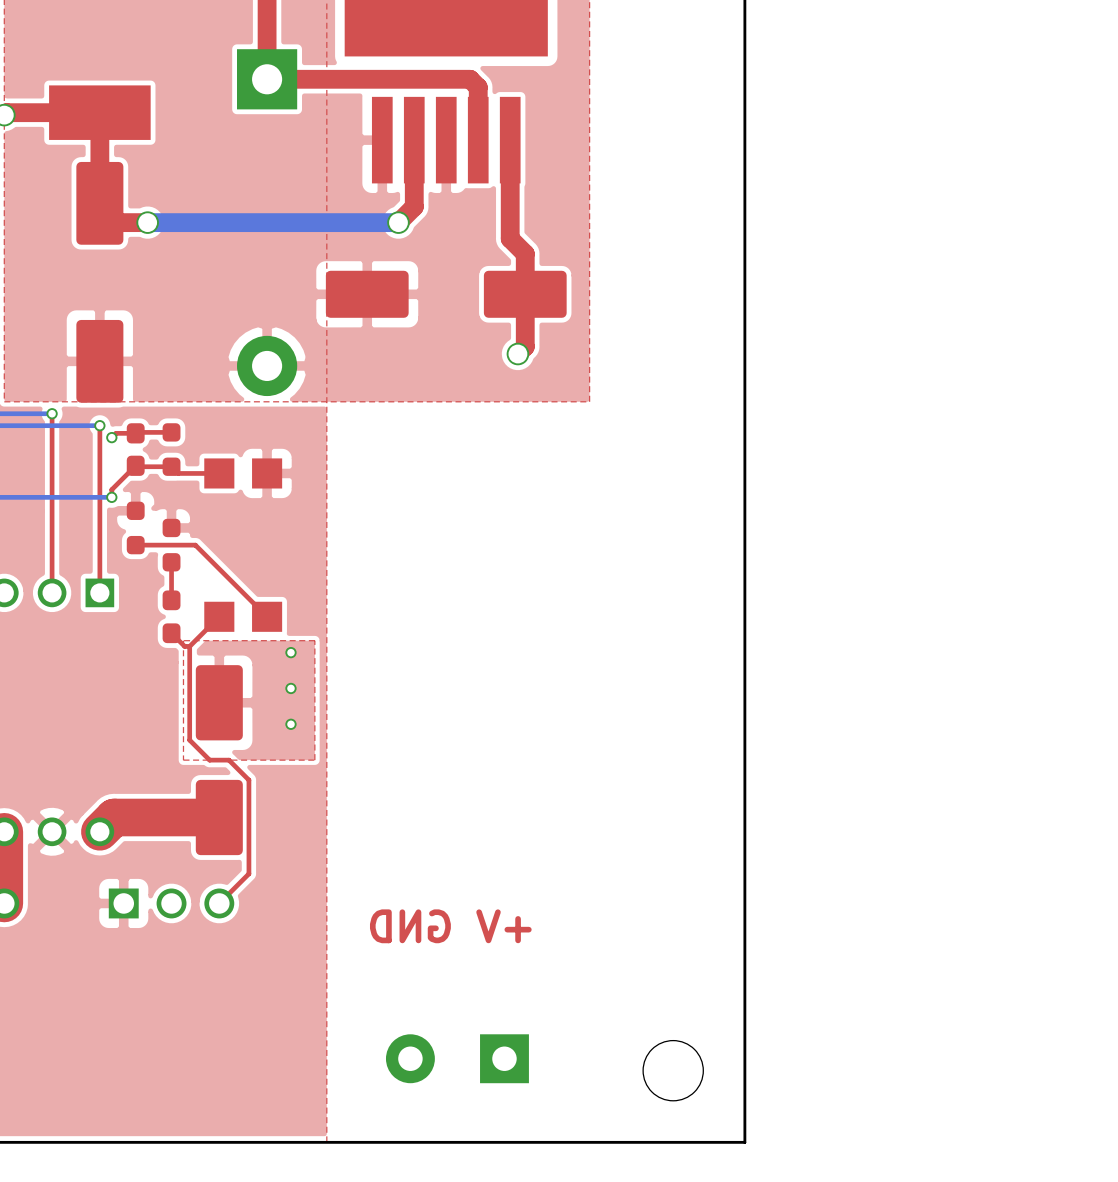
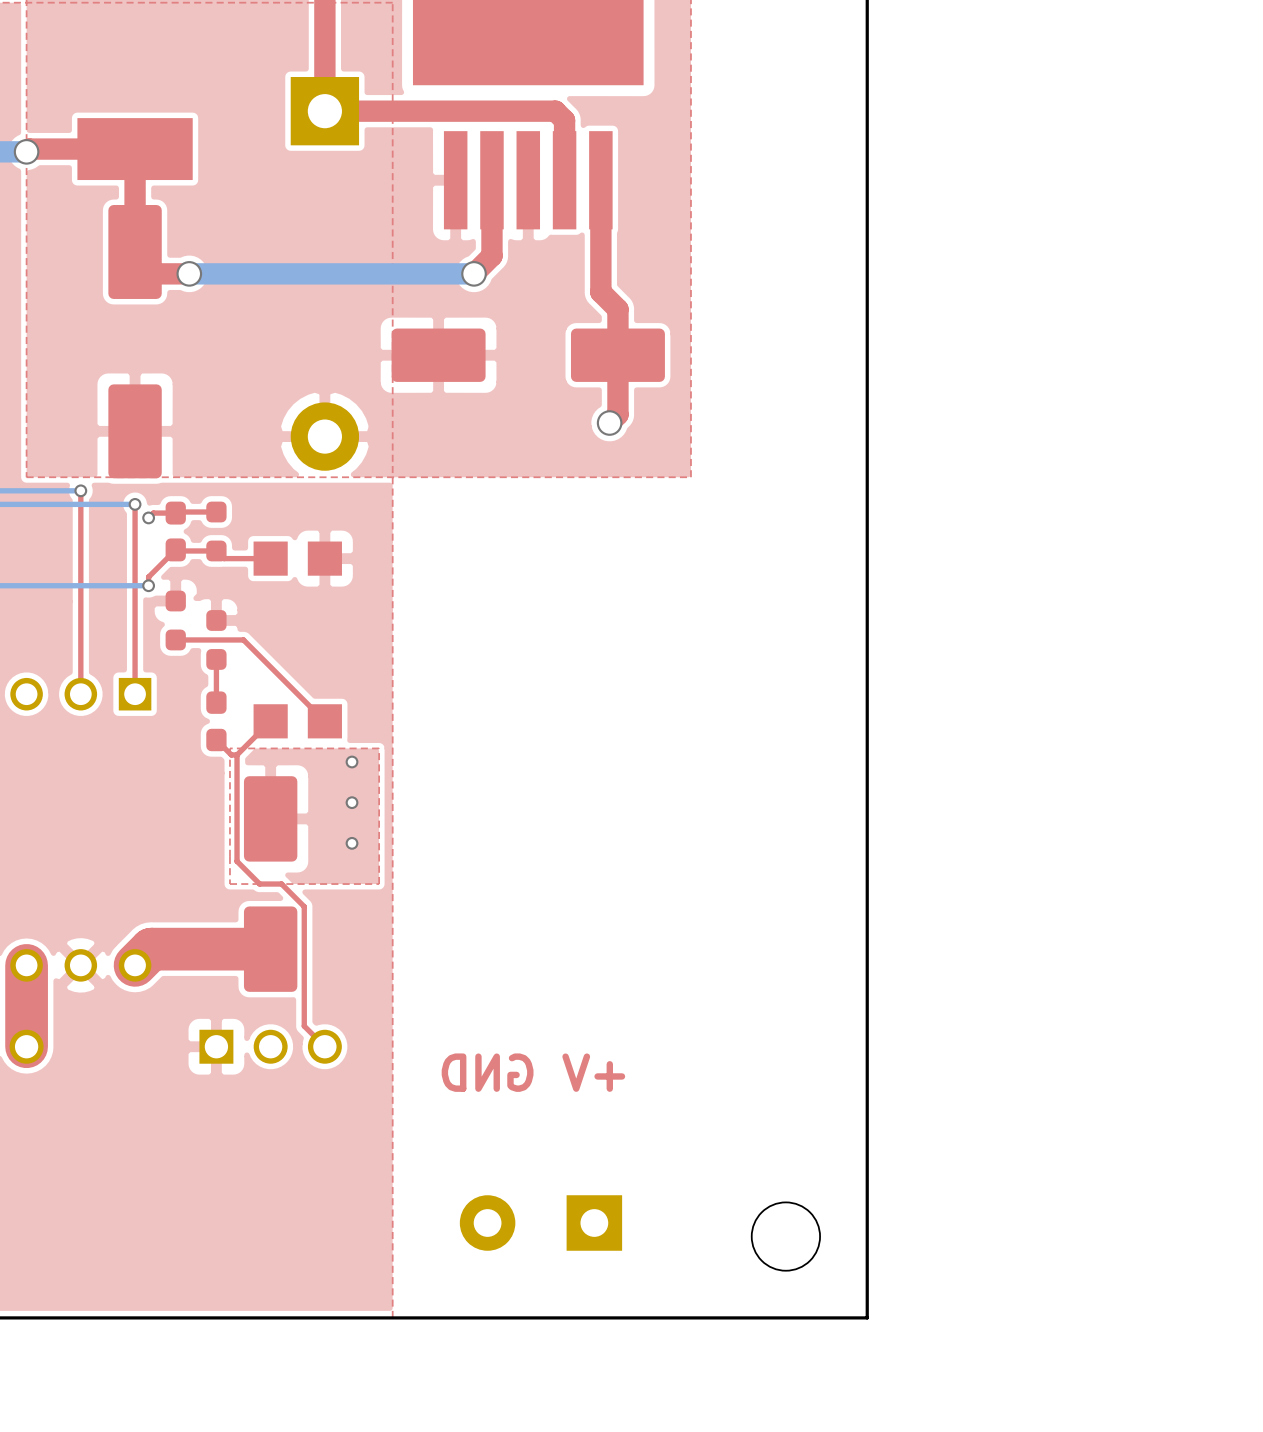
top track: (248, 873) (219, 903) -> (304, 1013) (304, 1026) (324, 1046)
part position: (171, 903) -> (270, 1046)

